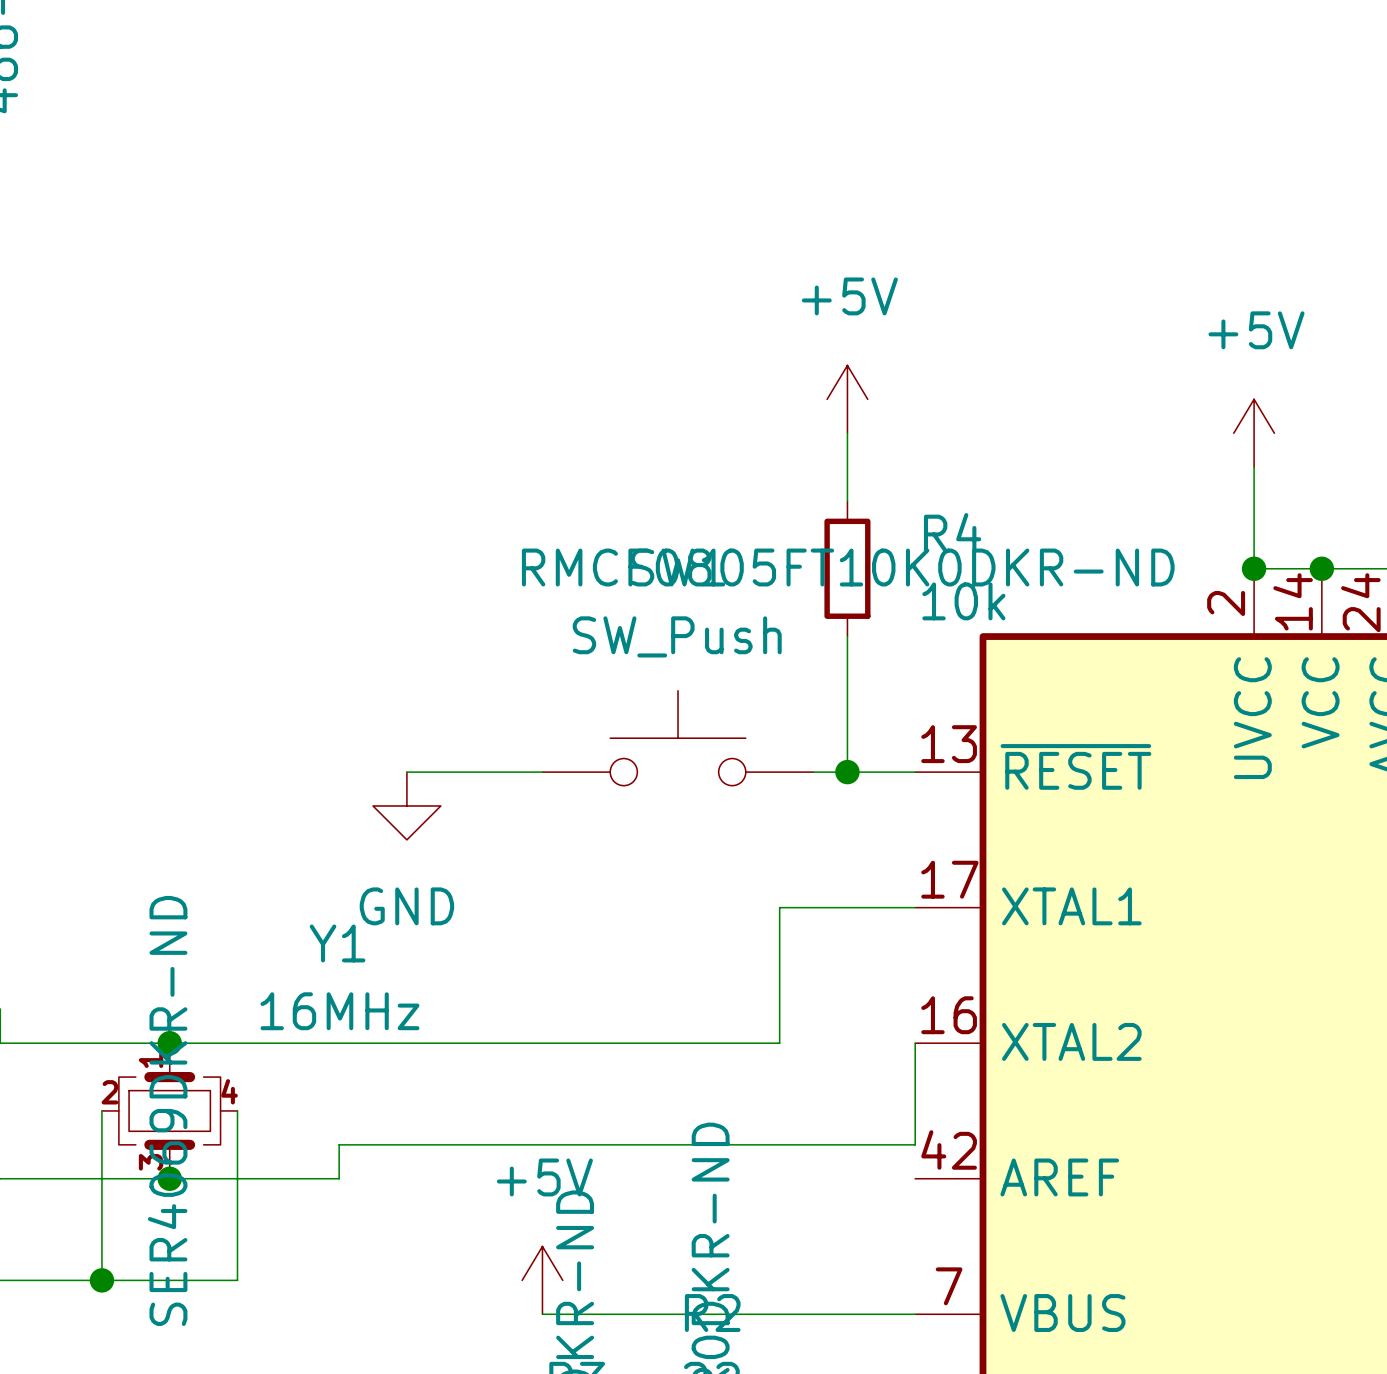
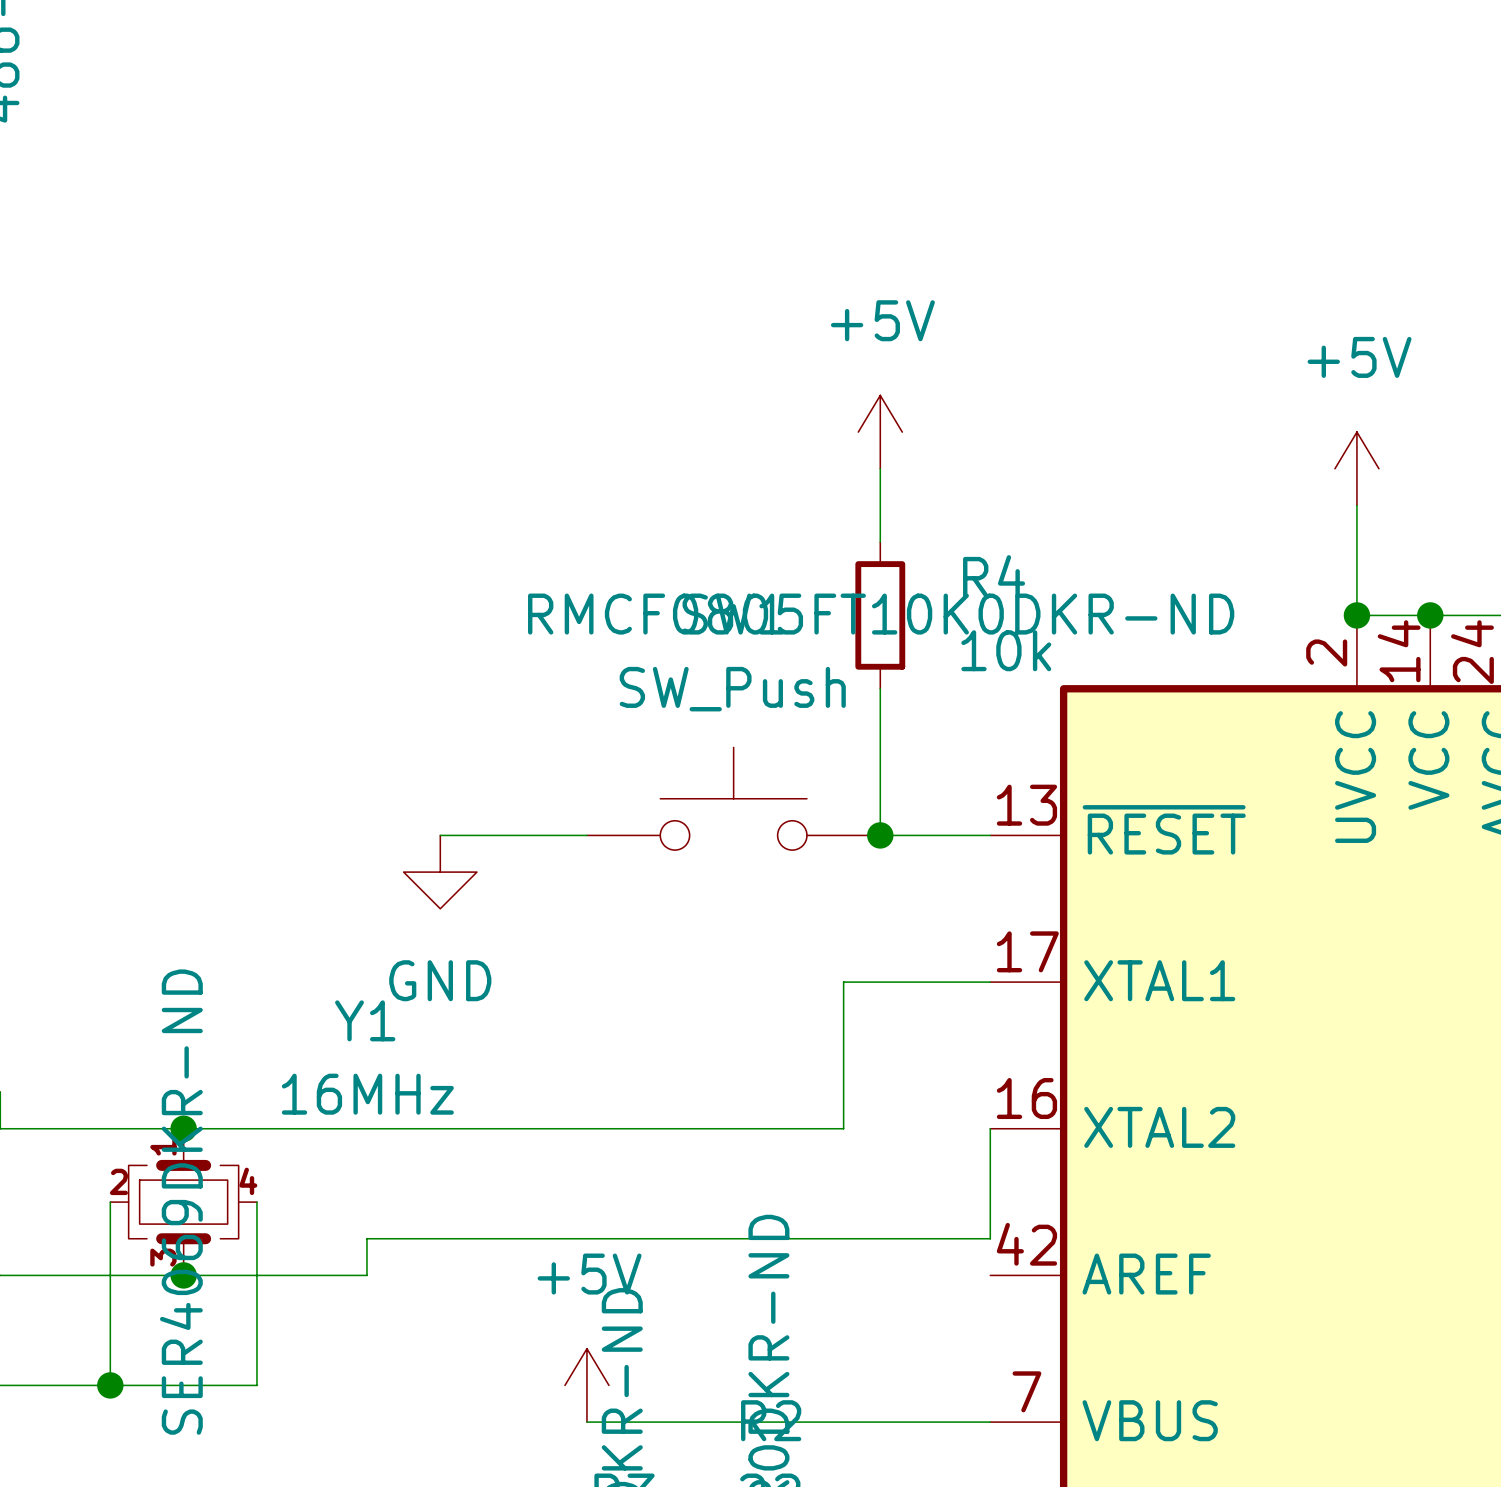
power symbol position: +5V (847, 399) -> +5V (880, 432)
wire: (847, 433) (847, 501) -> (880, 468) (880, 542)
R4 position: (847, 568) -> (880, 615)
wire: (847, 636) (847, 772) -> (880, 688) (880, 835)
junction position: (847, 772) -> (880, 835)

